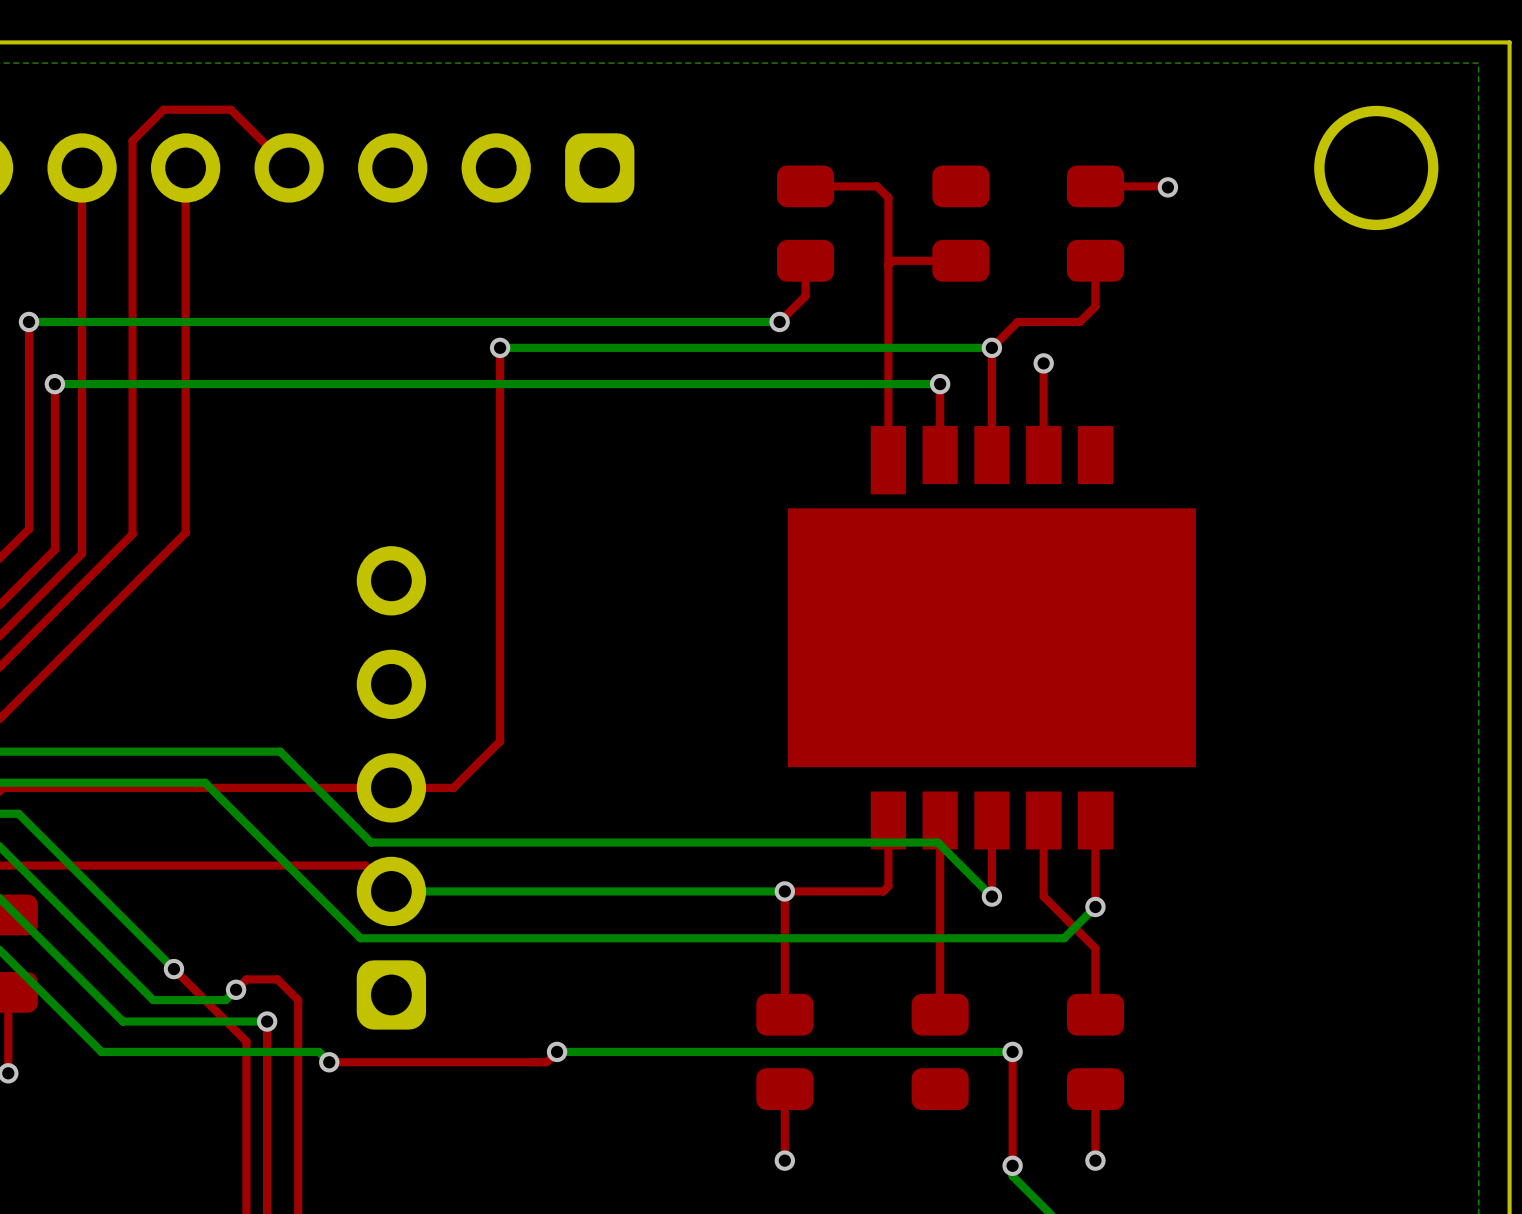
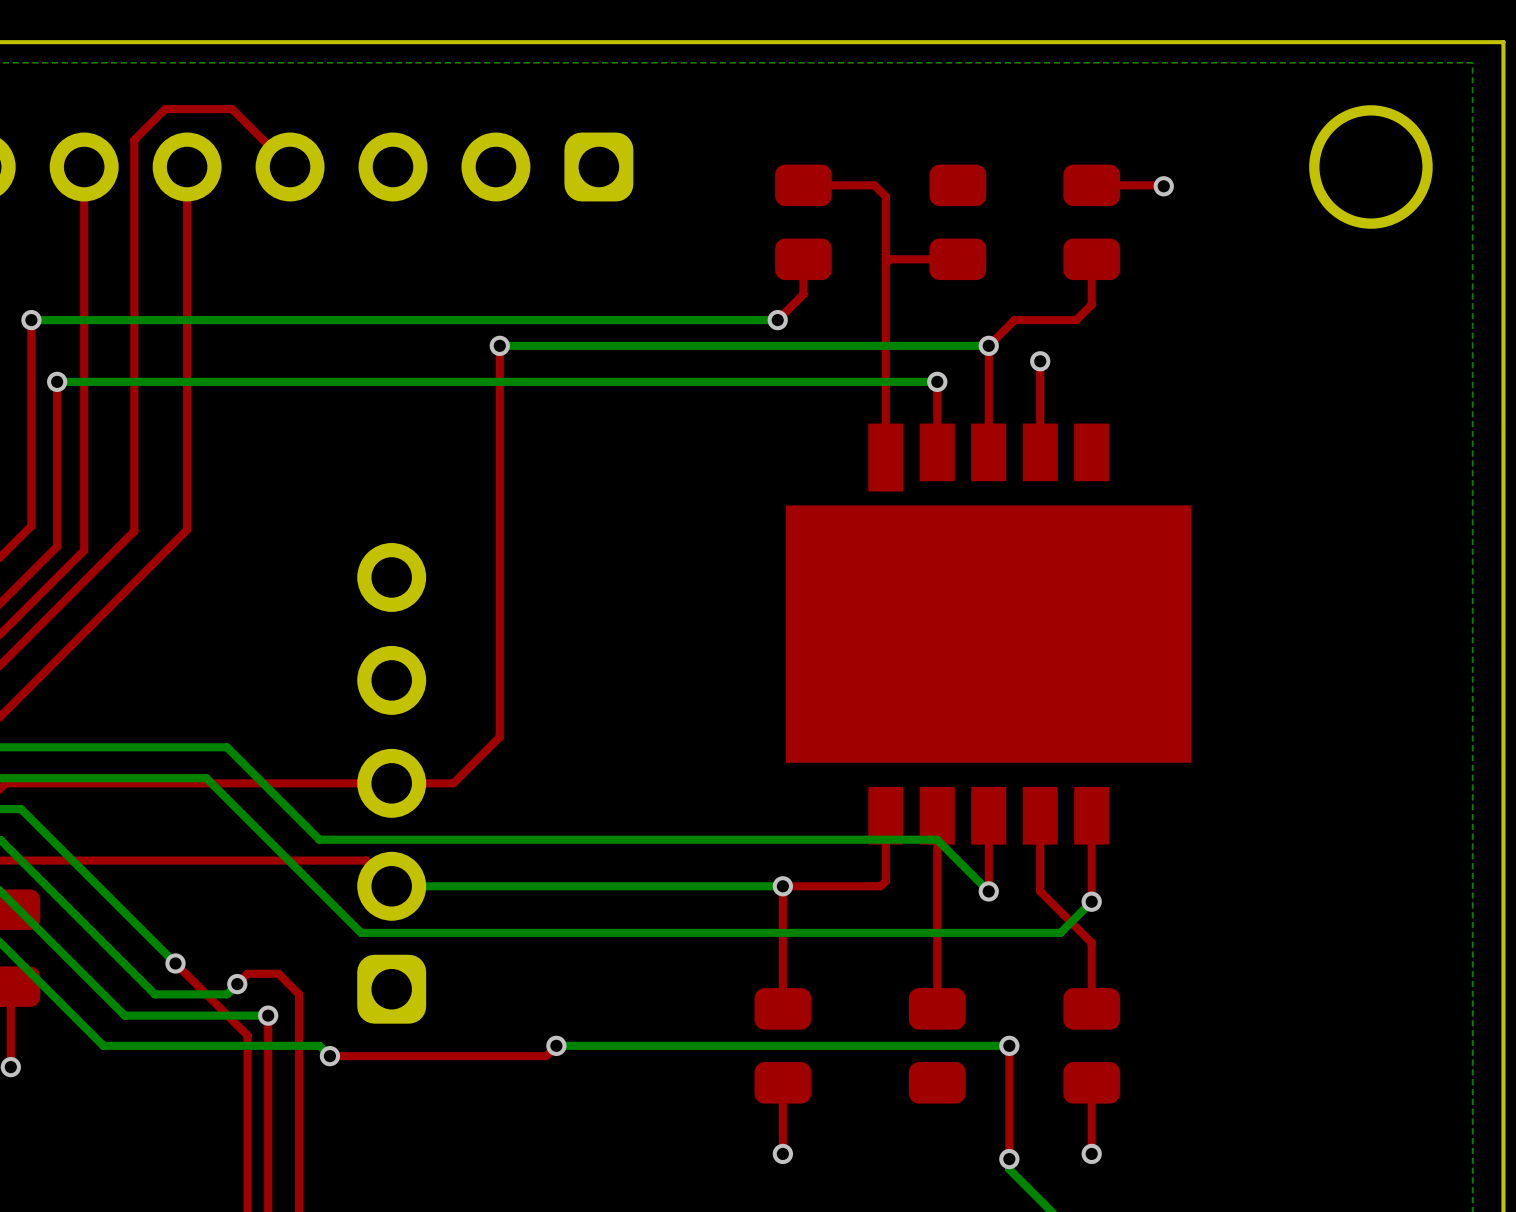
bottom track: (225, 751) (280, 751) (371, 842) (937, 842) (939, 844) -> (227, 747) (319, 839) (937, 839)

